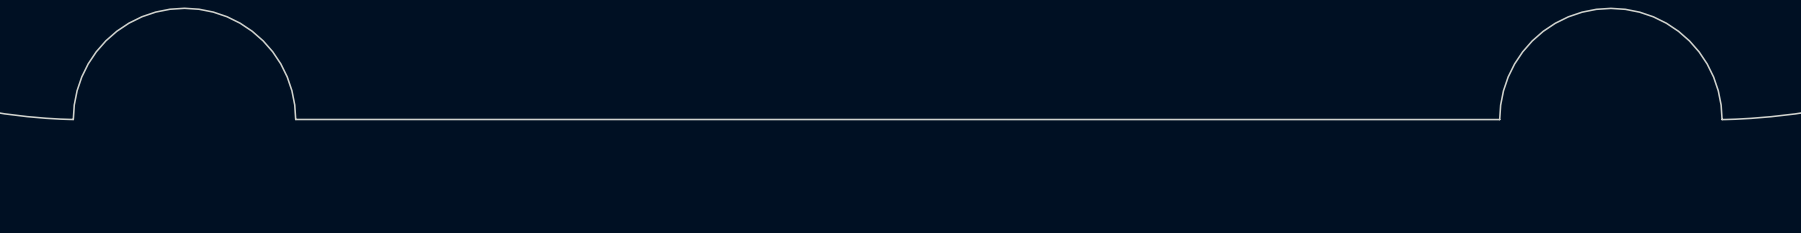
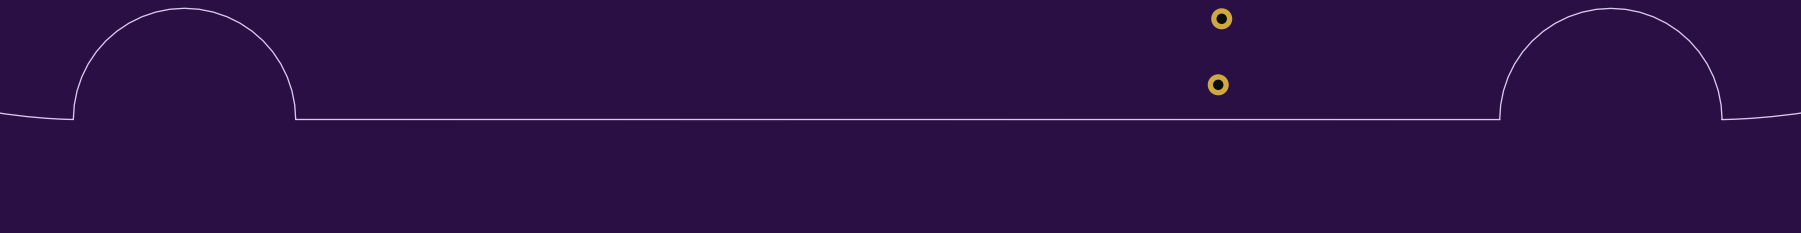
via: none -> (1221, 18)
via: none -> (1218, 84)

